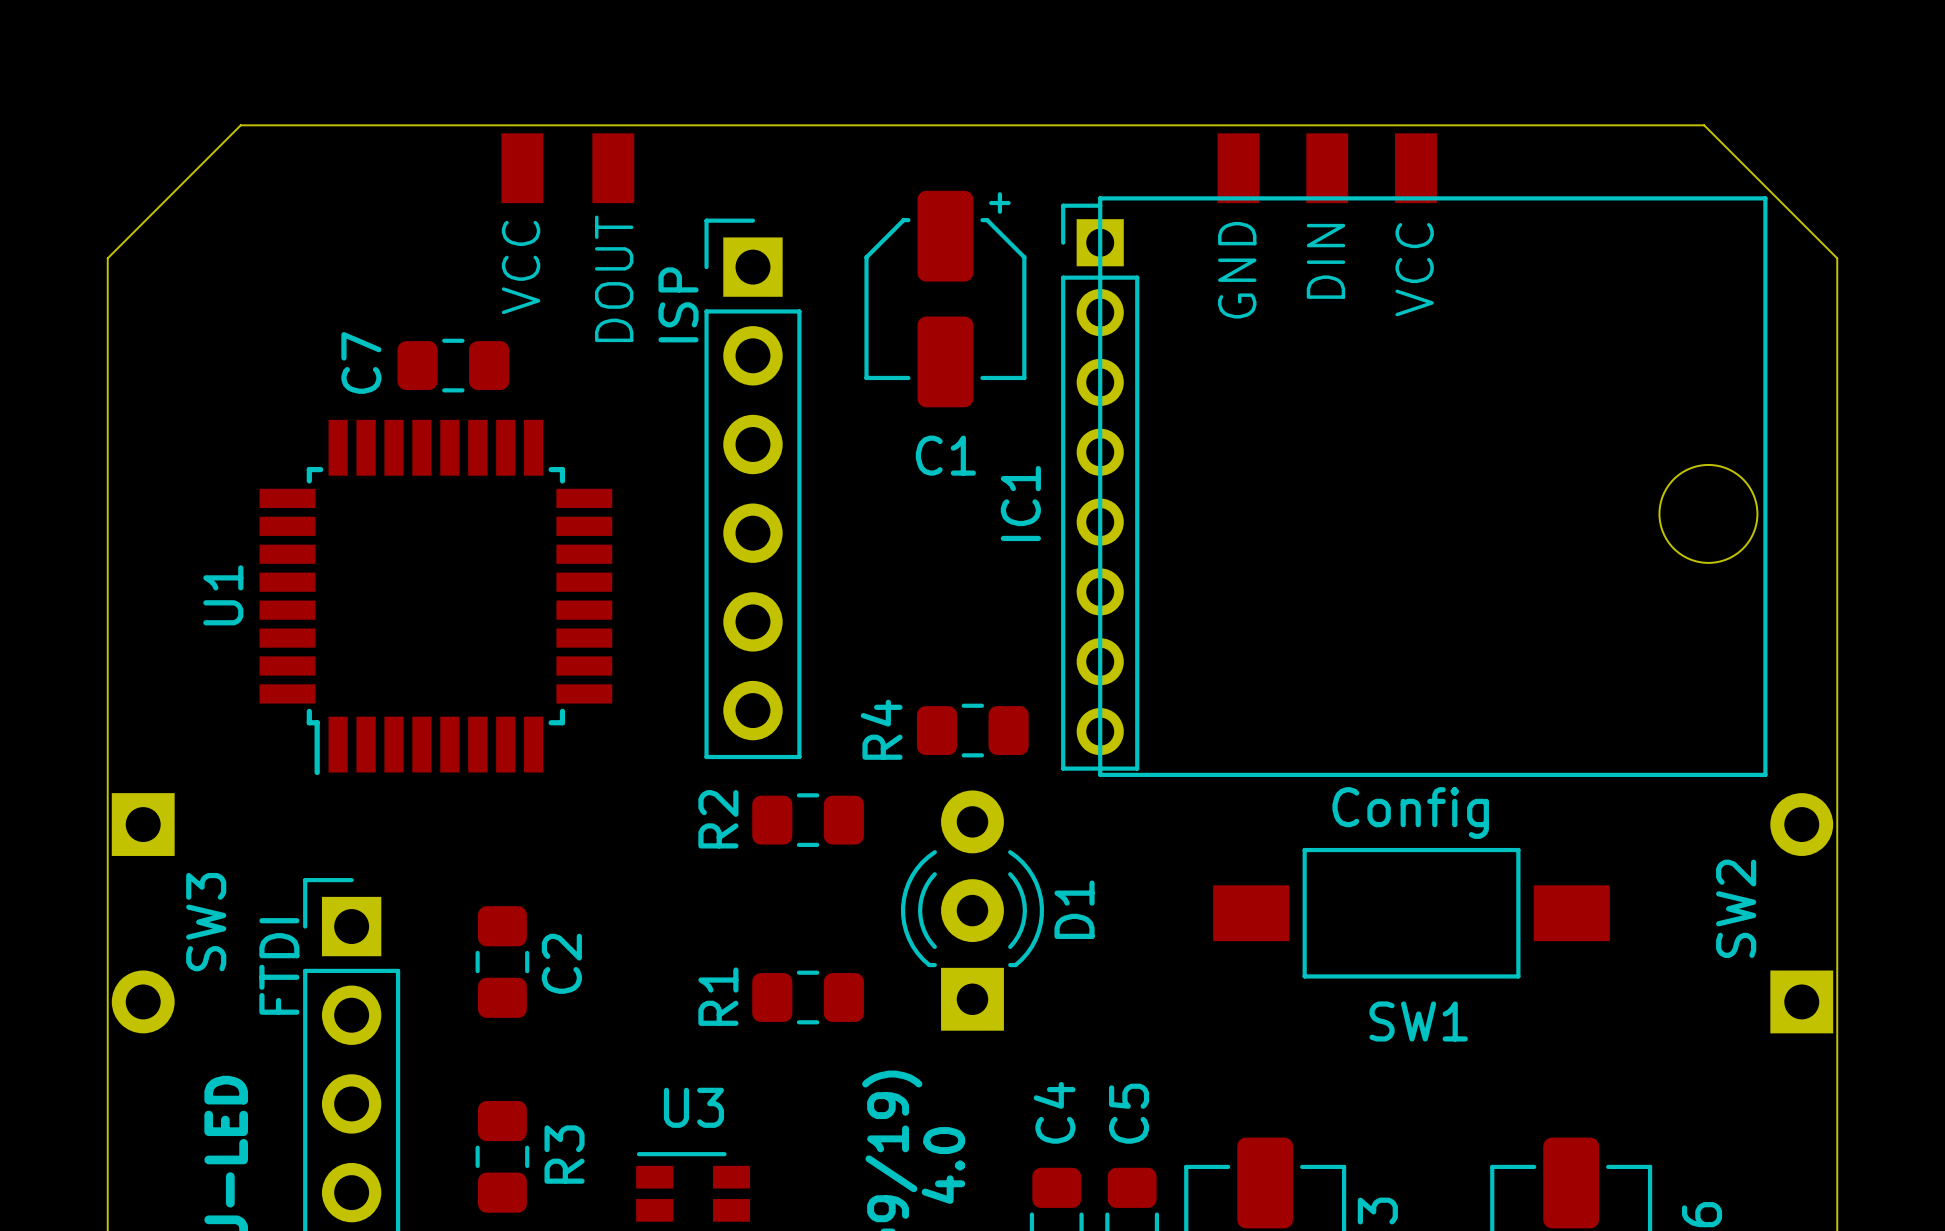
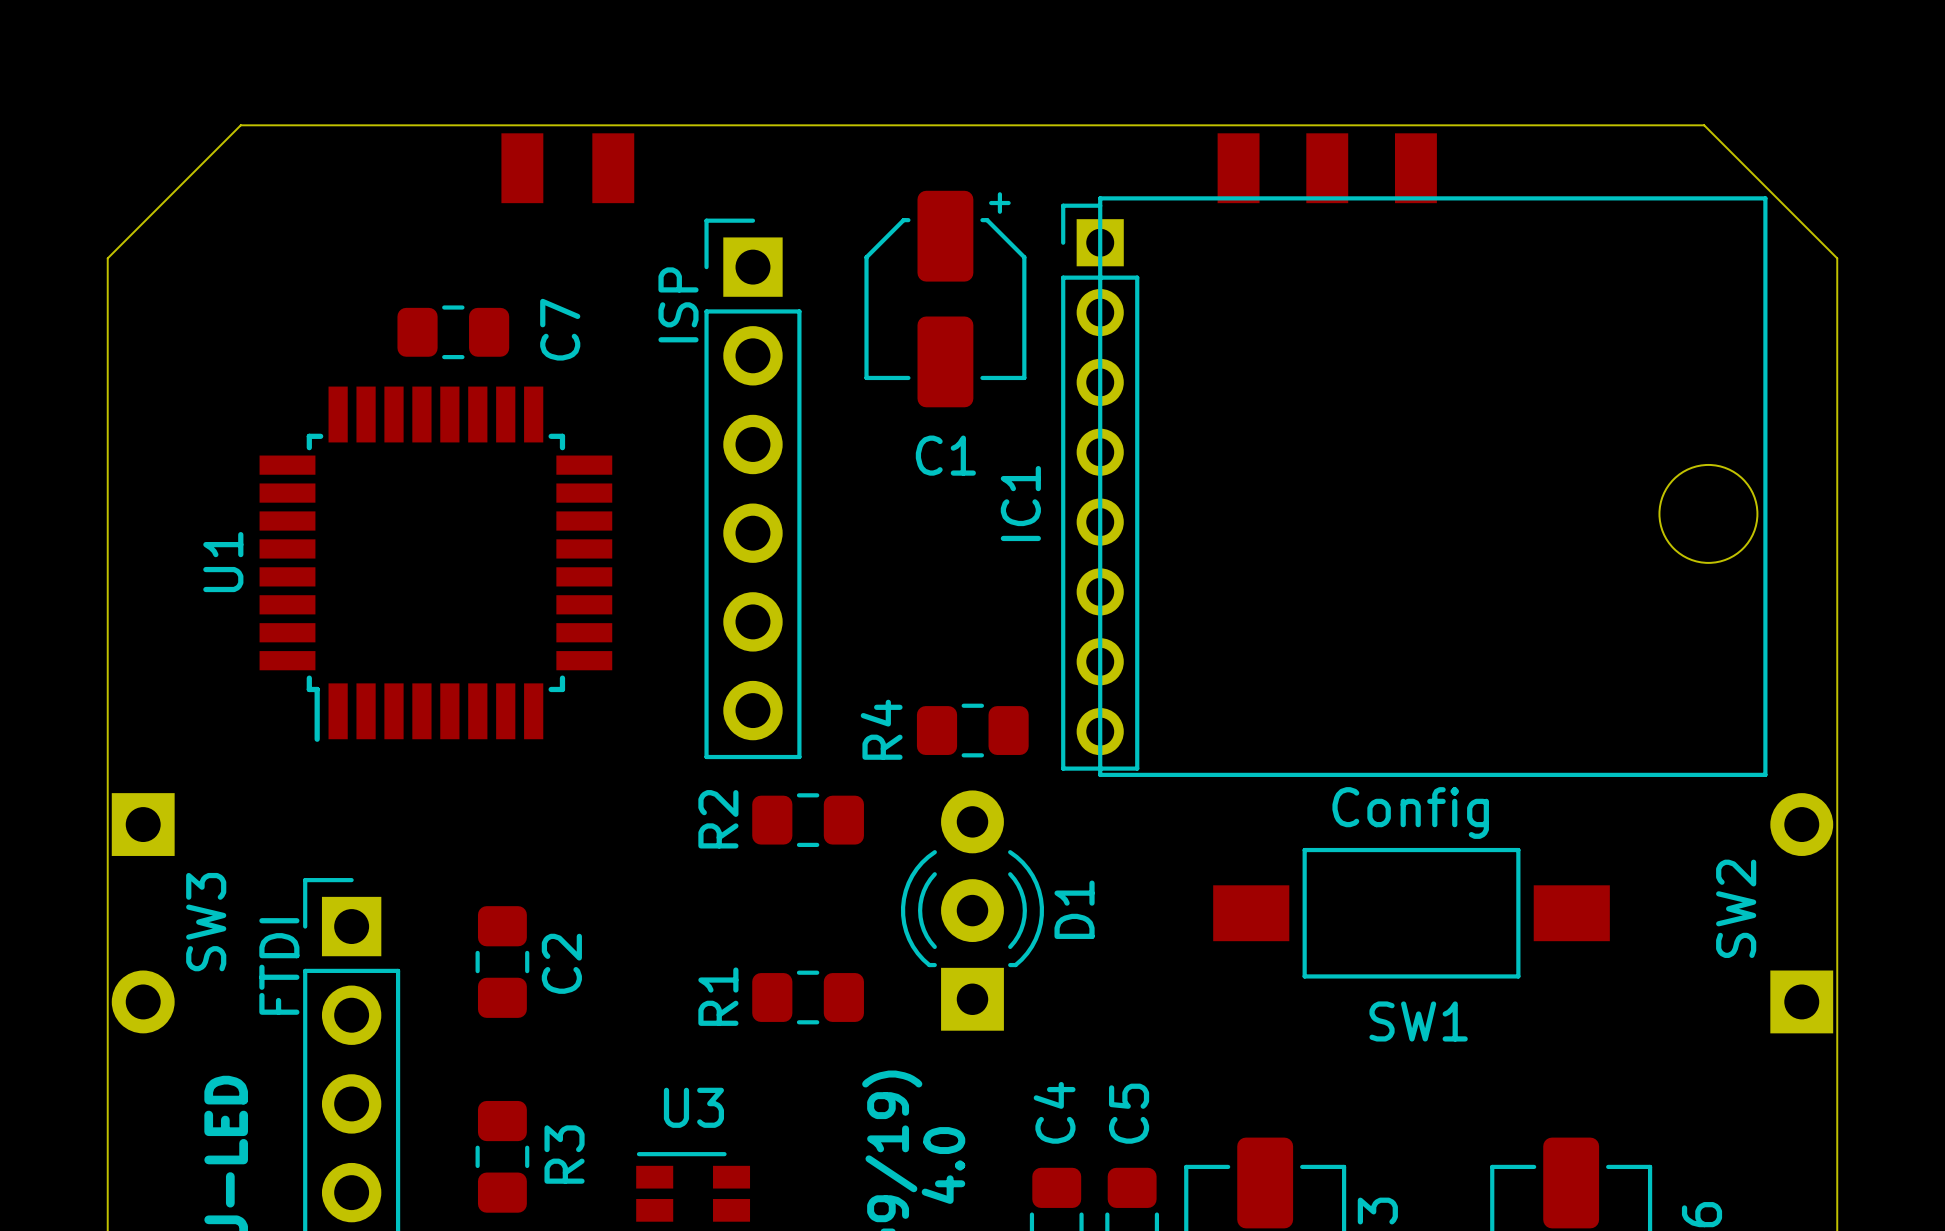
part value: DIN (1325, 261) -> none
part value: VCC (521, 267) -> none
part value: VCC (1414, 269) -> none
part value: GND (1237, 270) -> none
part value: DOUT (614, 278) -> none
C7 name position: C7 (361, 362) -> C7 (560, 329)
C7 position: (453, 365) -> (453, 332)
U1 position: (435, 597) -> (435, 564)

